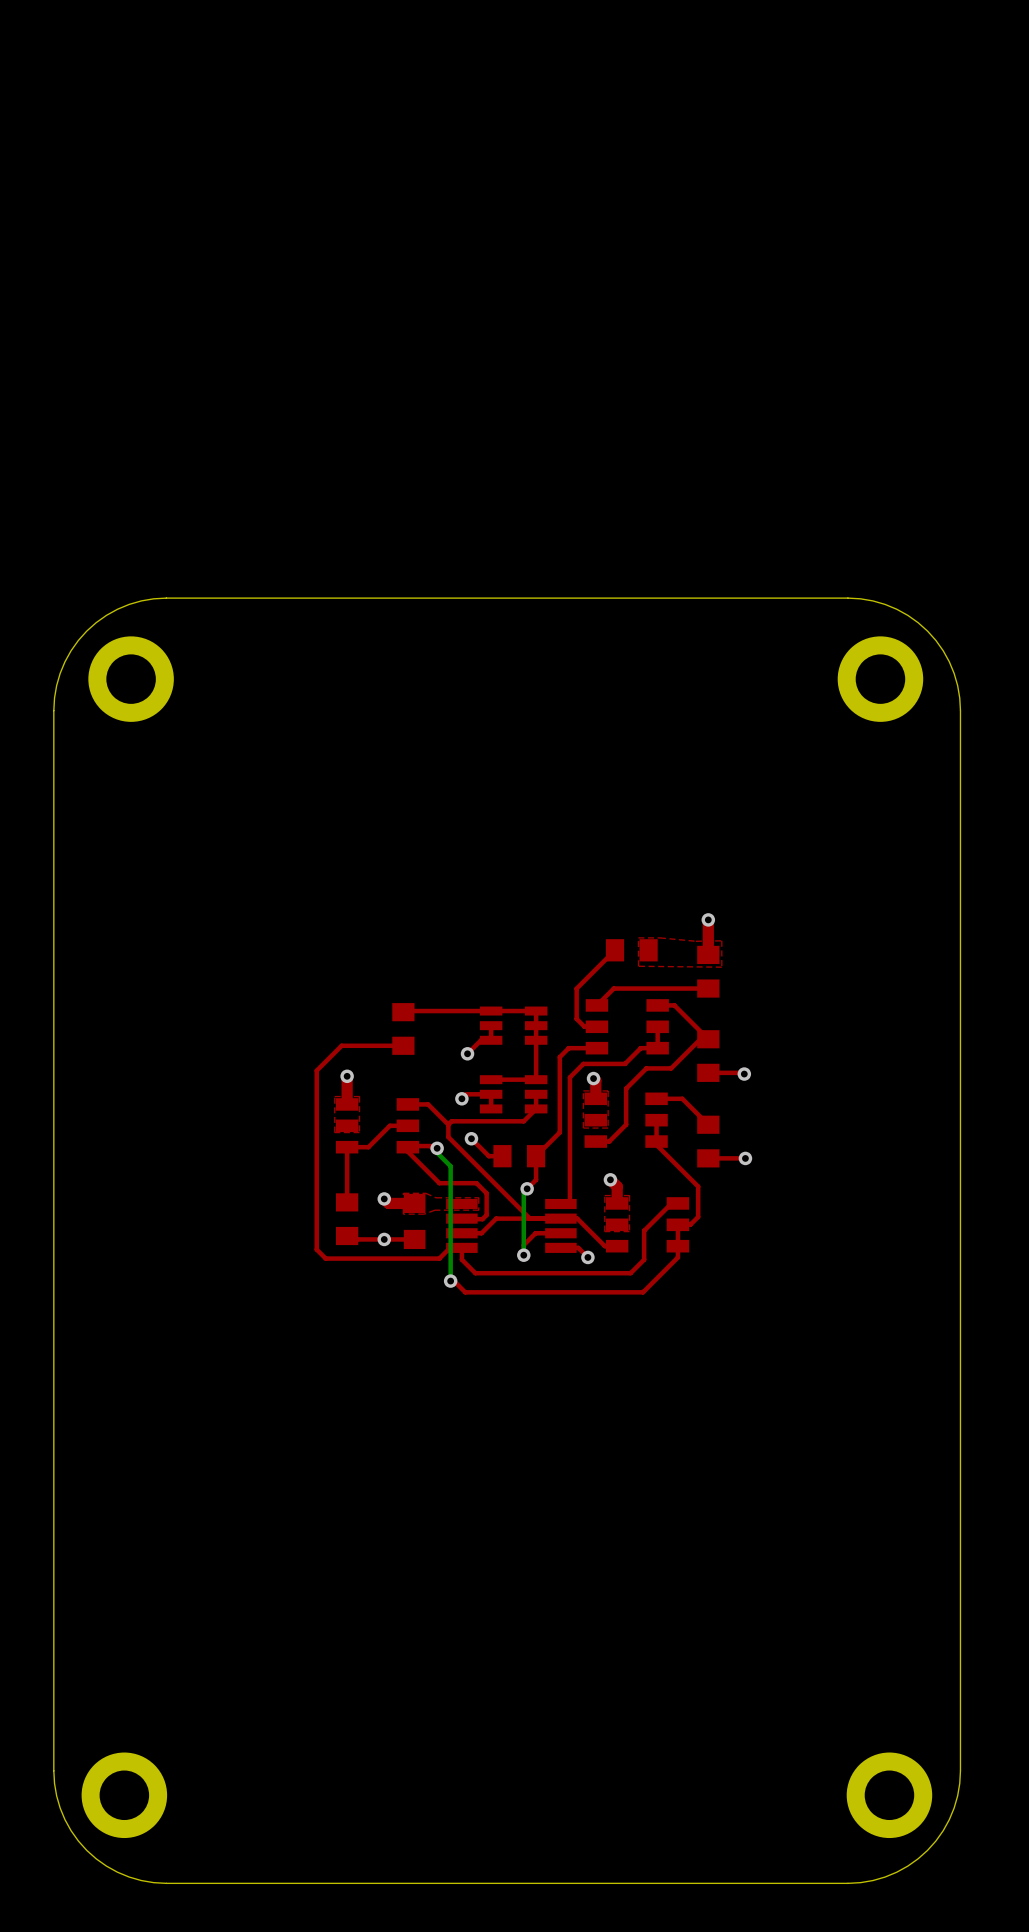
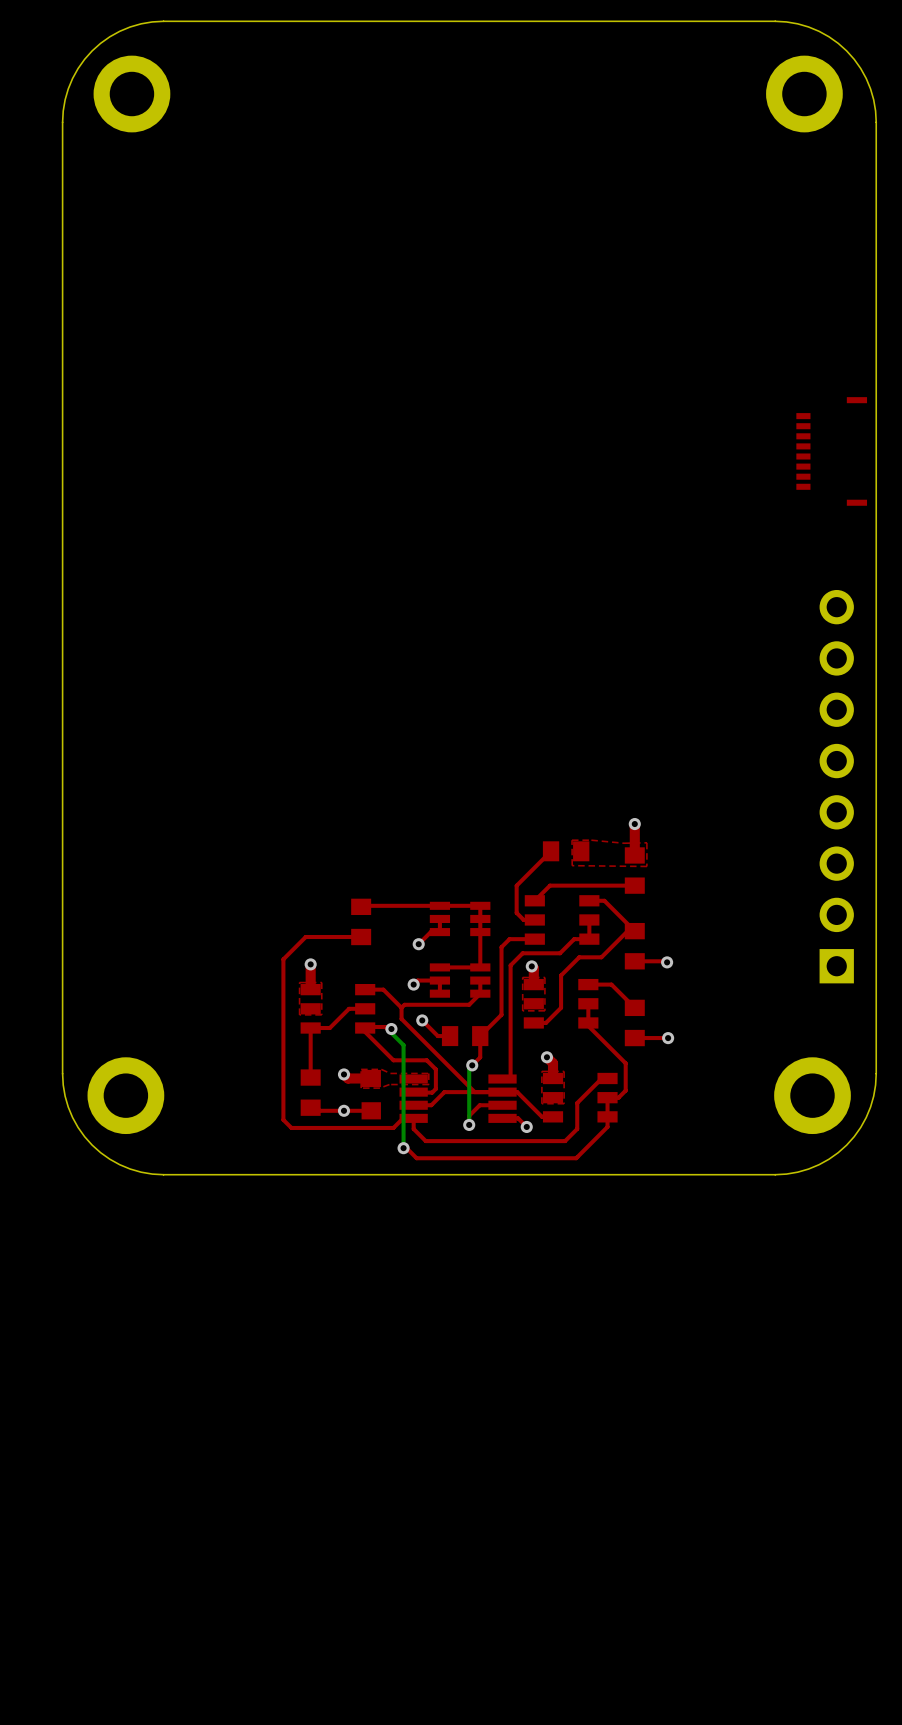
board edge: none -> (775, 21) (152, 21) (130, 26) (109, 36) (92, 50) (78, 68) (68, 88) (62, 122) (62, 1073) (68, 1107) (78, 1127) (92, 1145) (109, 1159) (130, 1169) (163, 1174) (775, 1174) (797, 1172) (828, 1159) (846, 1145) (860, 1127) (870, 1107) (876, 1073) (875, 110) (870, 88) (860, 68) (838, 43) (808, 26) (775, 21)
part: none -> (131, 94)
part: none -> (804, 94)
part: none -> (831, 451)
board edge: (847, 598) (153, 598) (129, 604) (106, 615) (86, 631) (71, 650) (56, 685) (53, 710) (53, 1770) (56, 1795) (64, 1819) (78, 1840) (106, 1866) (141, 1880) (166, 1883) (847, 1883) (872, 1880) (896, 1872) (927, 1850) (943, 1830) (957, 1795) (960, 1770) (959, 698) (949, 661) (935, 640) (918, 622) (885, 604) (847, 598) -> none
part: (131, 679) -> none
part: (880, 679) -> none
part: none -> (836, 786)
part: none -> (125, 1095)
part: none -> (812, 1095)
part: (124, 1795) -> none
part: (889, 1795) -> none

